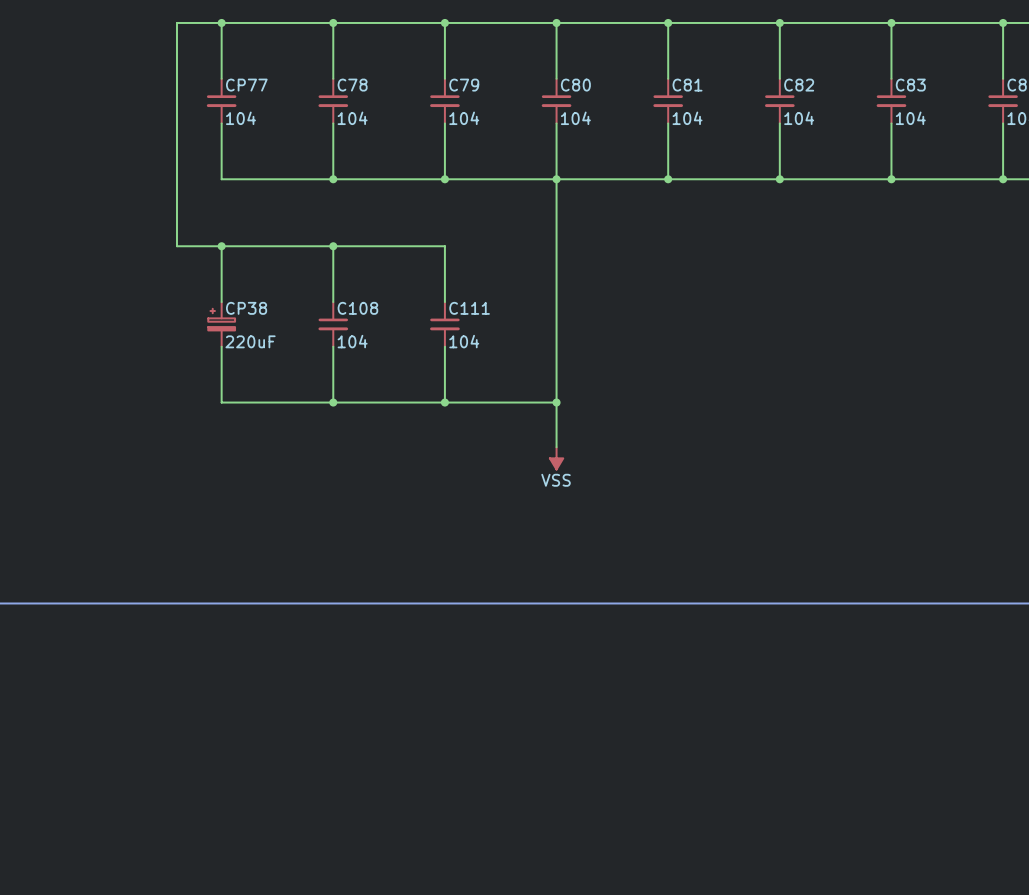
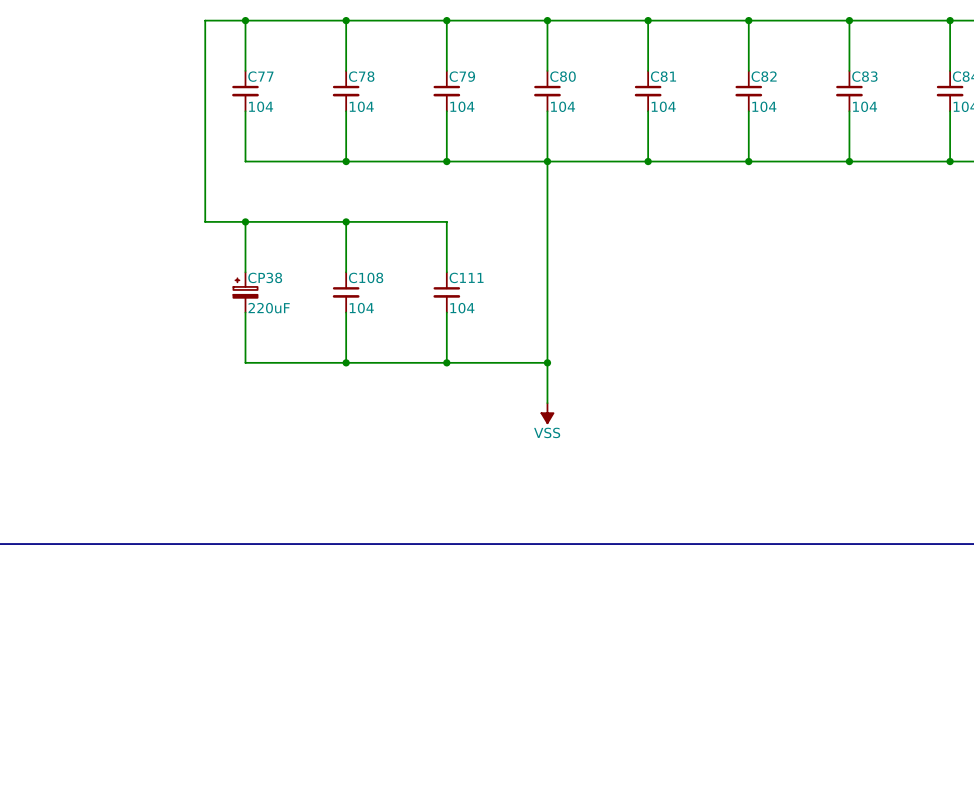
CP77 name: CP77 (246, 85) -> C77 (260, 76)

